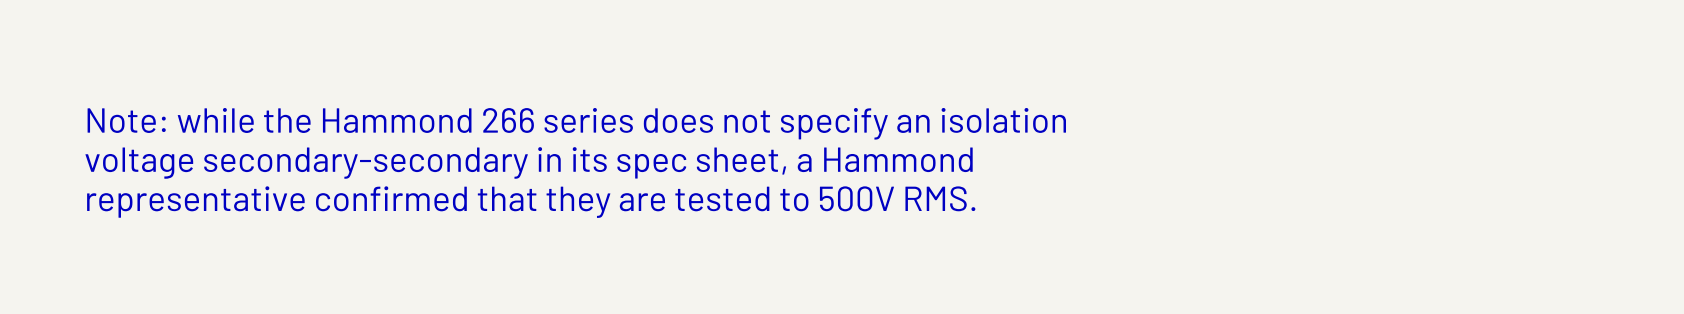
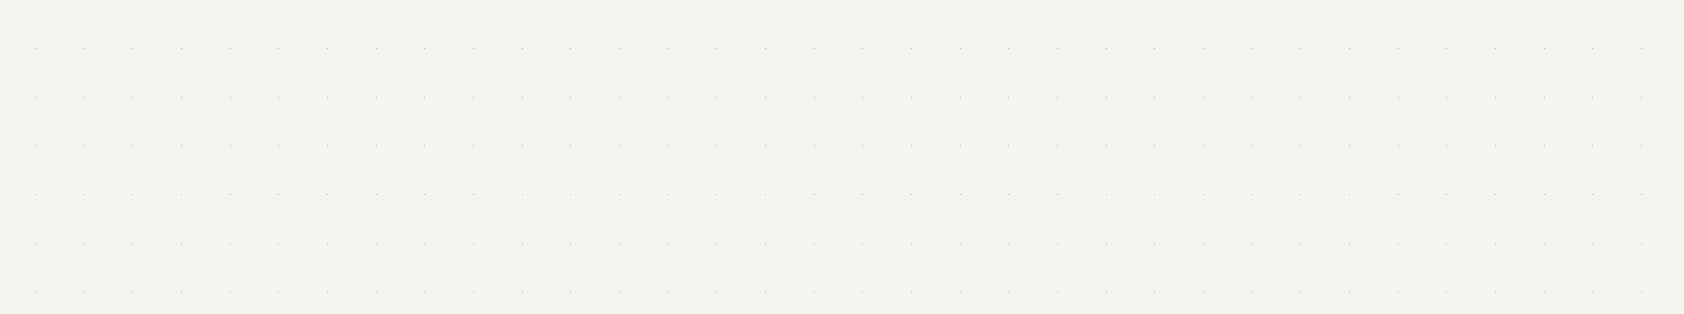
text: Note: while the Hammond 266 series does not specify an isolation (576, 123) -> none
text: voltage secondary-secondary in its spec sheet, a Hammond (529, 162) -> none
text: representative confirmed that they are tested to 500V RMS. (531, 202) -> none

